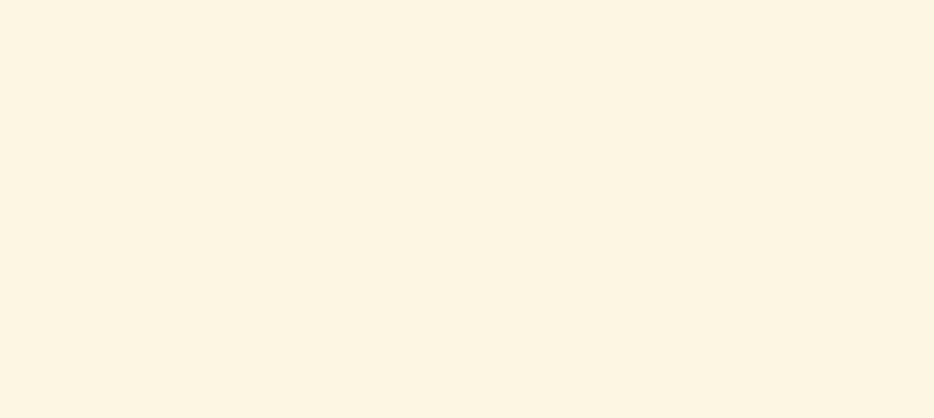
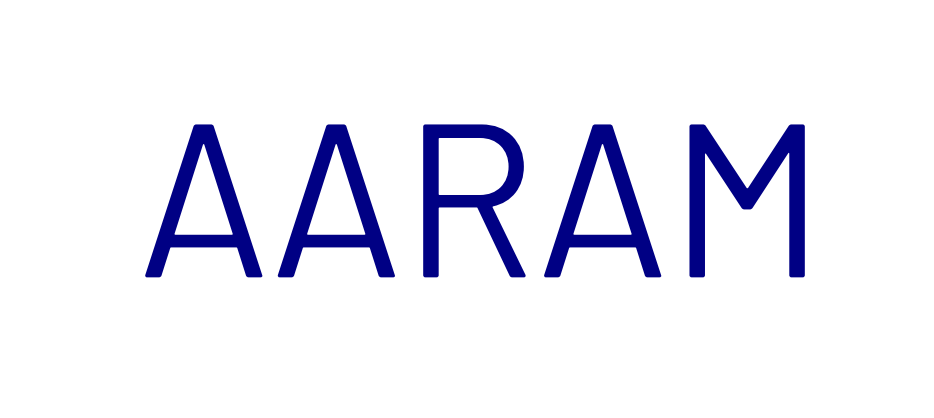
text: none -> AARAM (474, 200)

